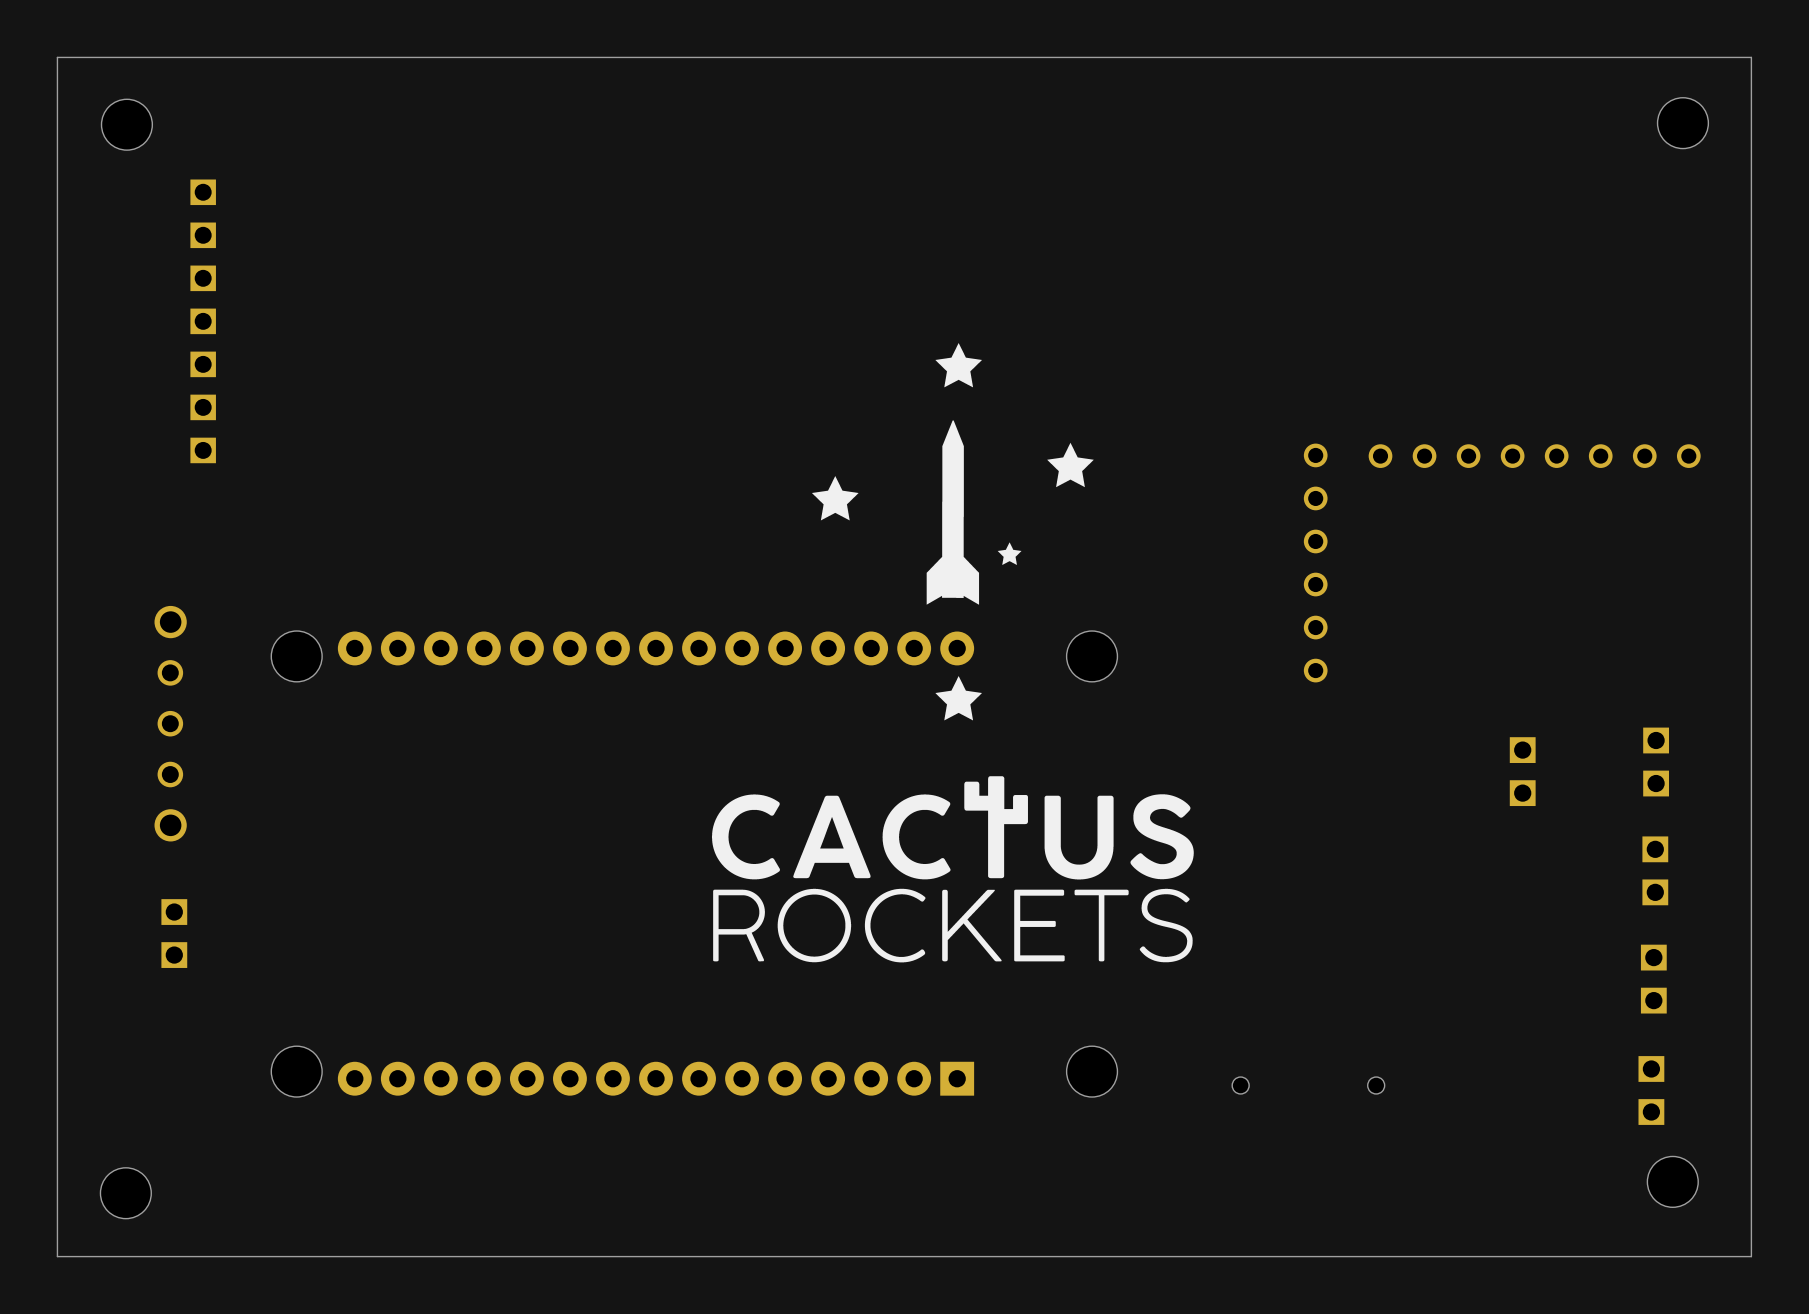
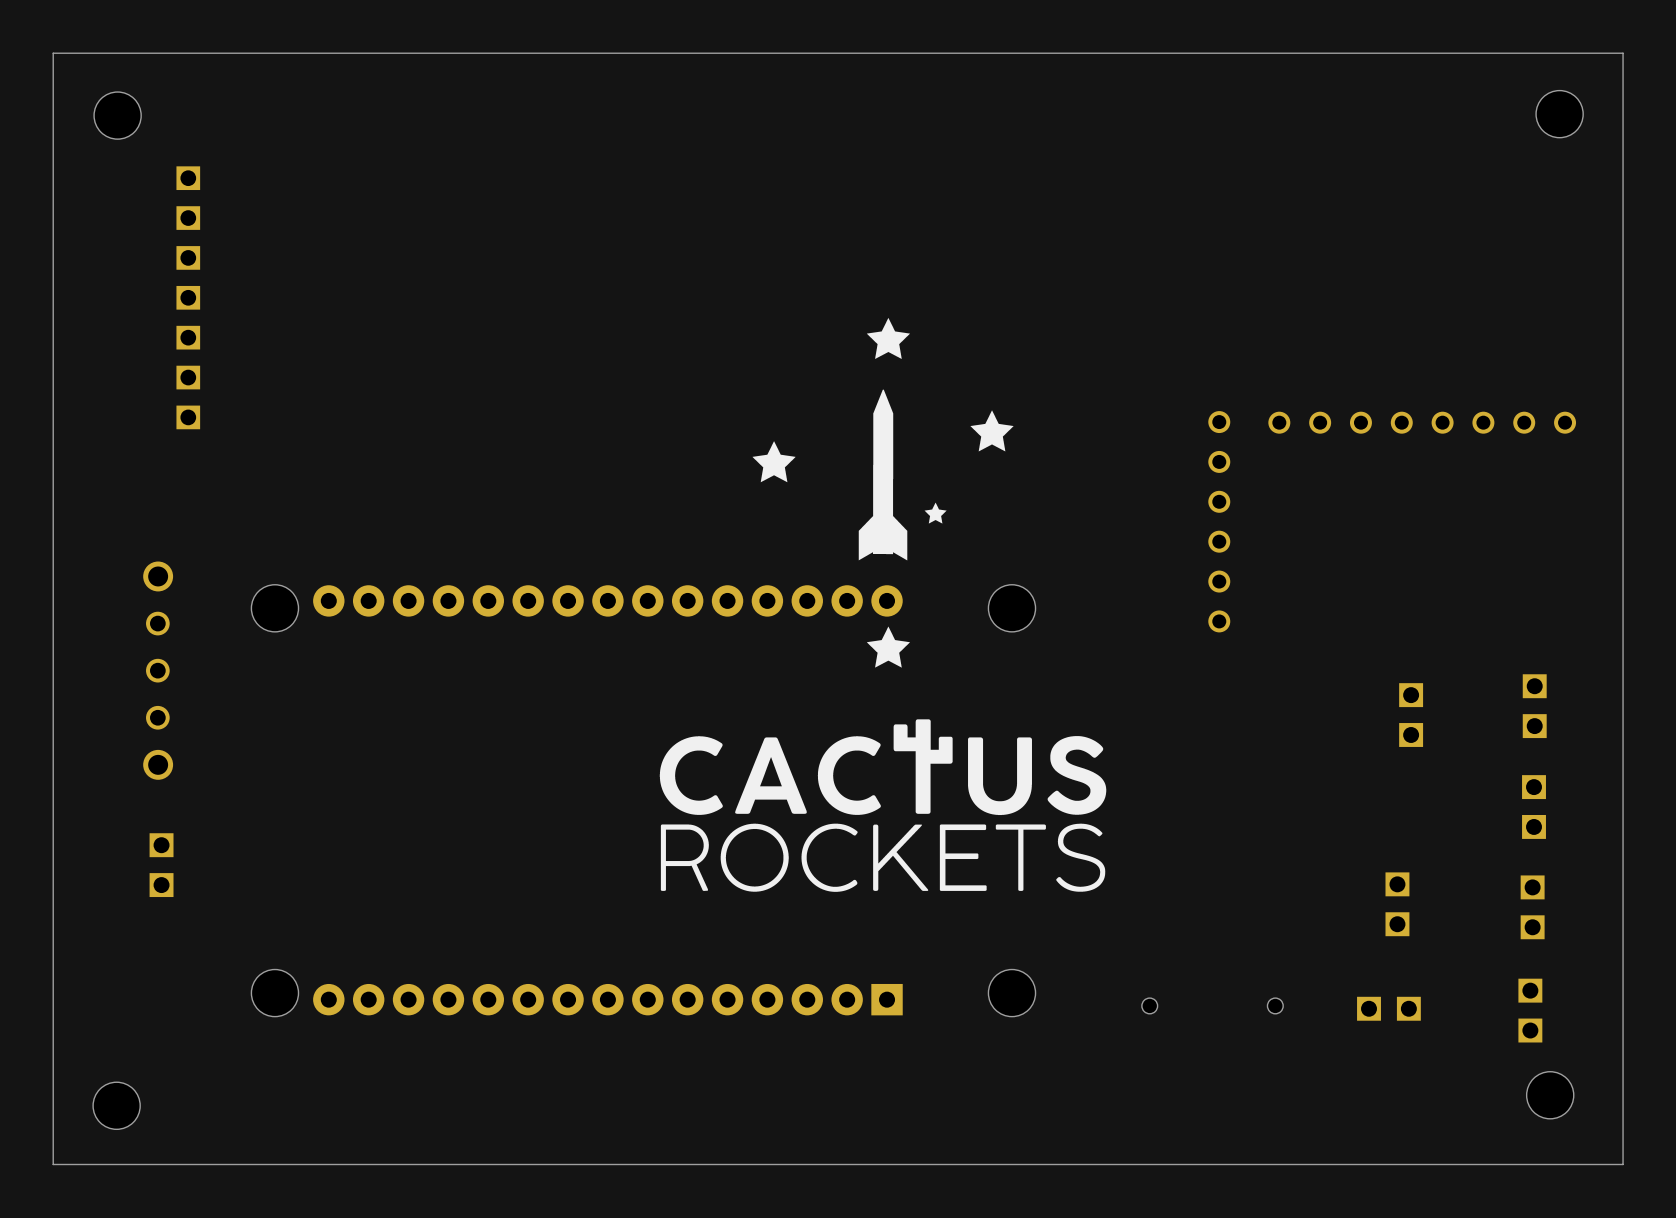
part: none -> (1397, 904)
part: none -> (1388, 1008)

